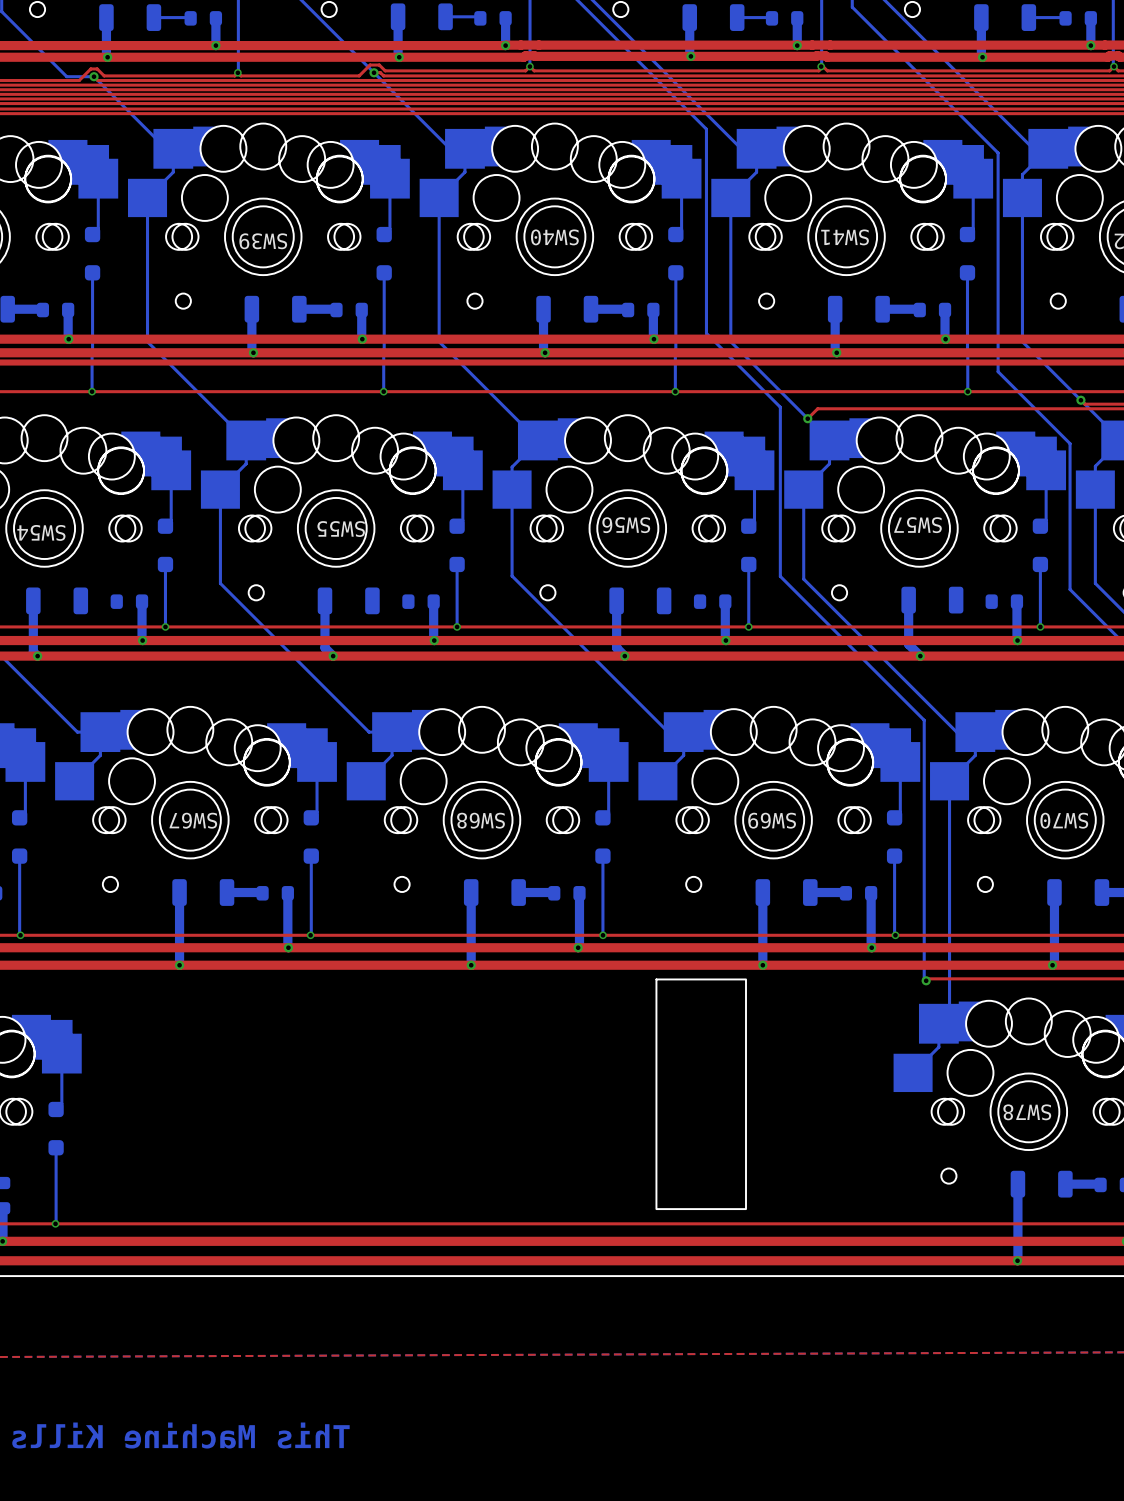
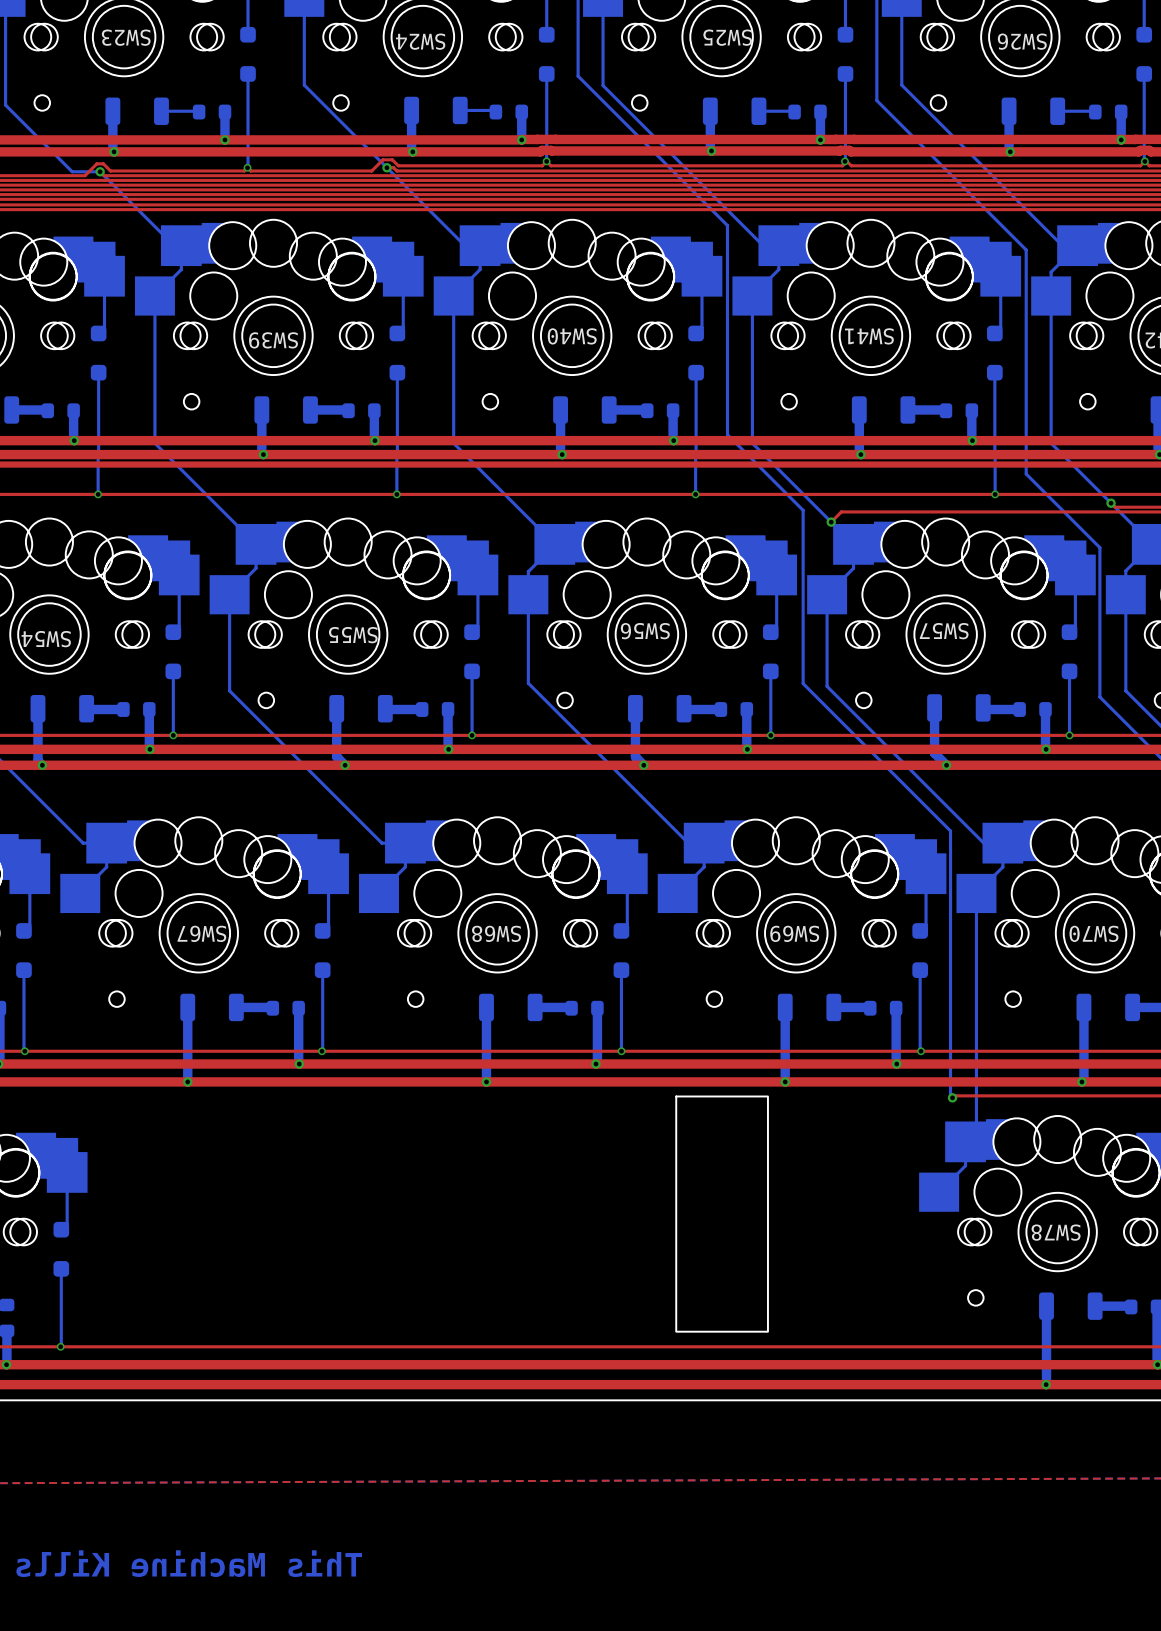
bottom track: none -> (86, 708) (123, 709)
bottom track: none -> (385, 708) (422, 709)
bottom track: none -> (684, 708) (720, 709)
bottom track: none -> (983, 707) (984, 709) (1019, 709)

